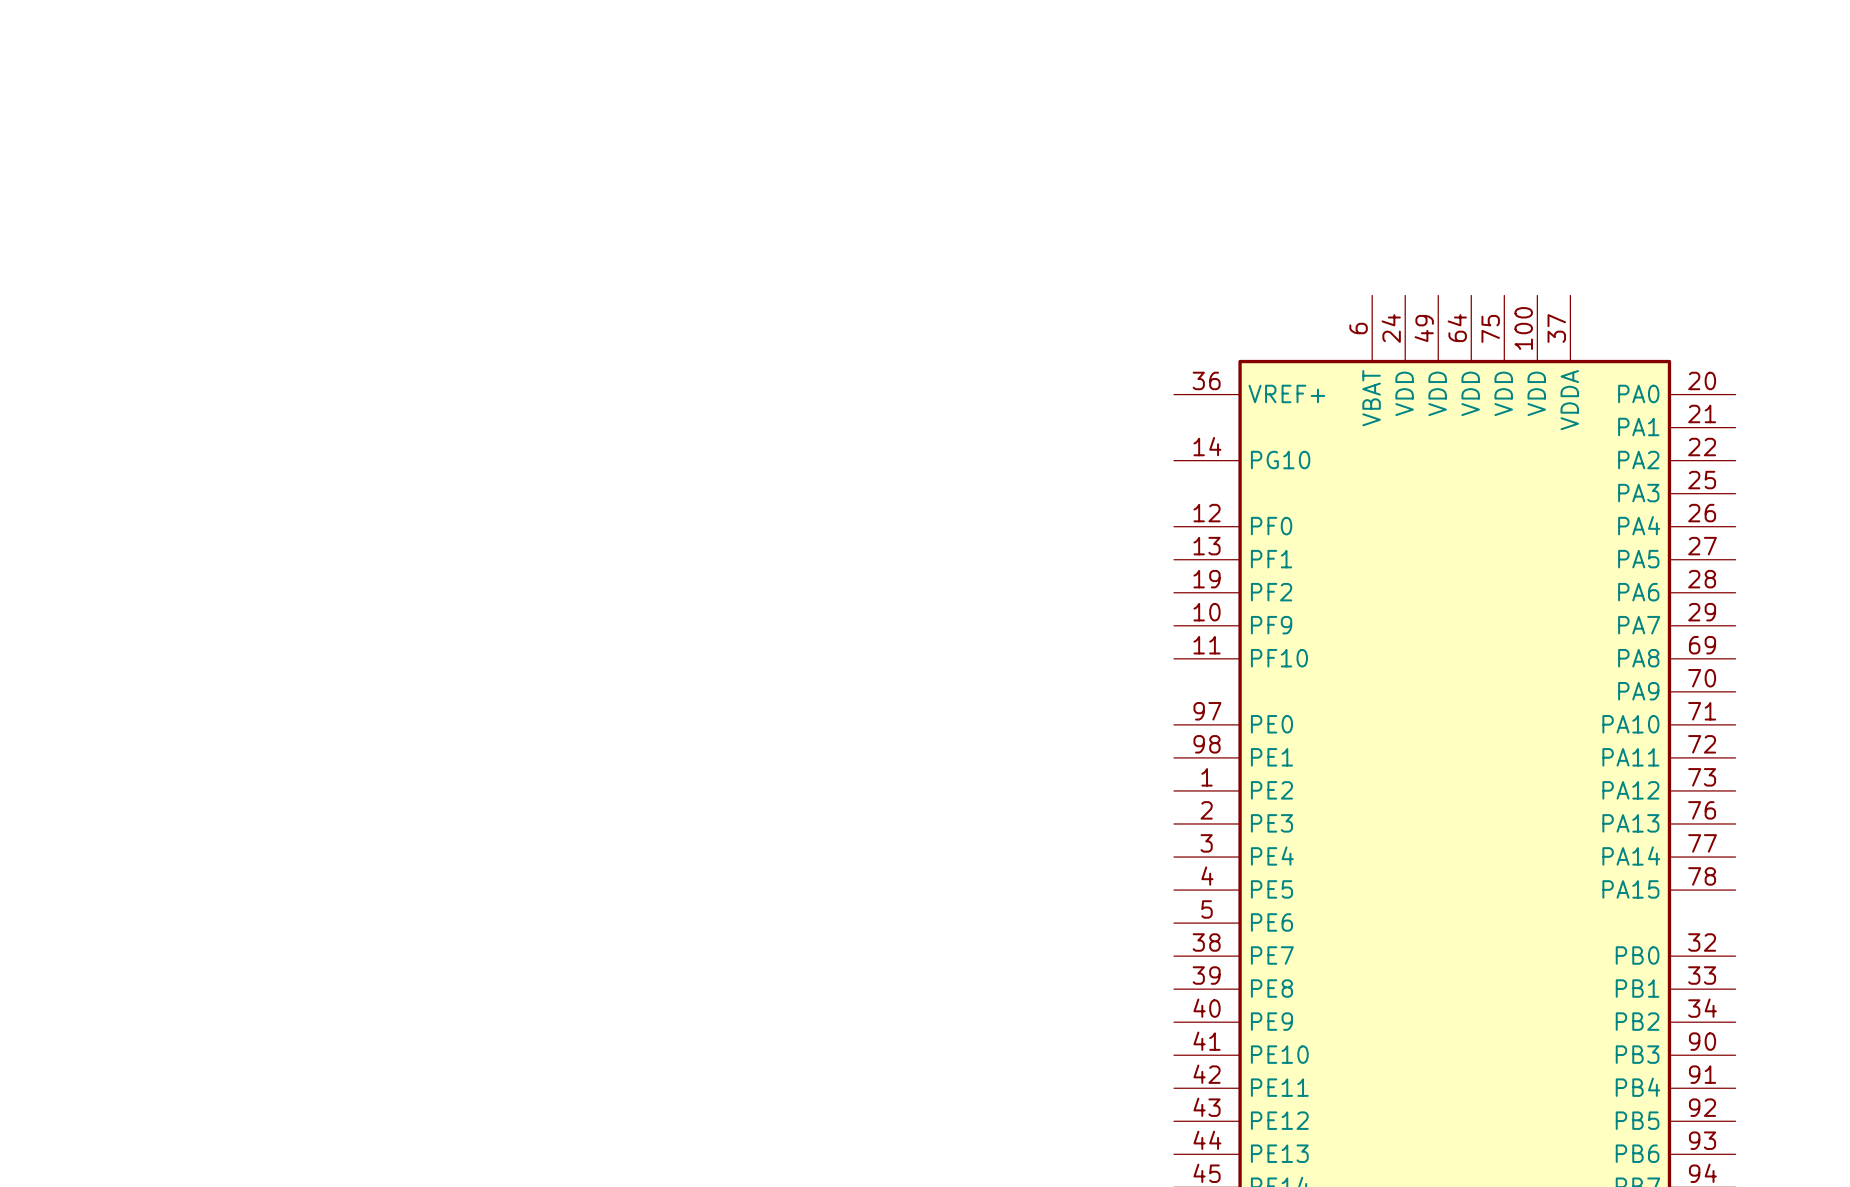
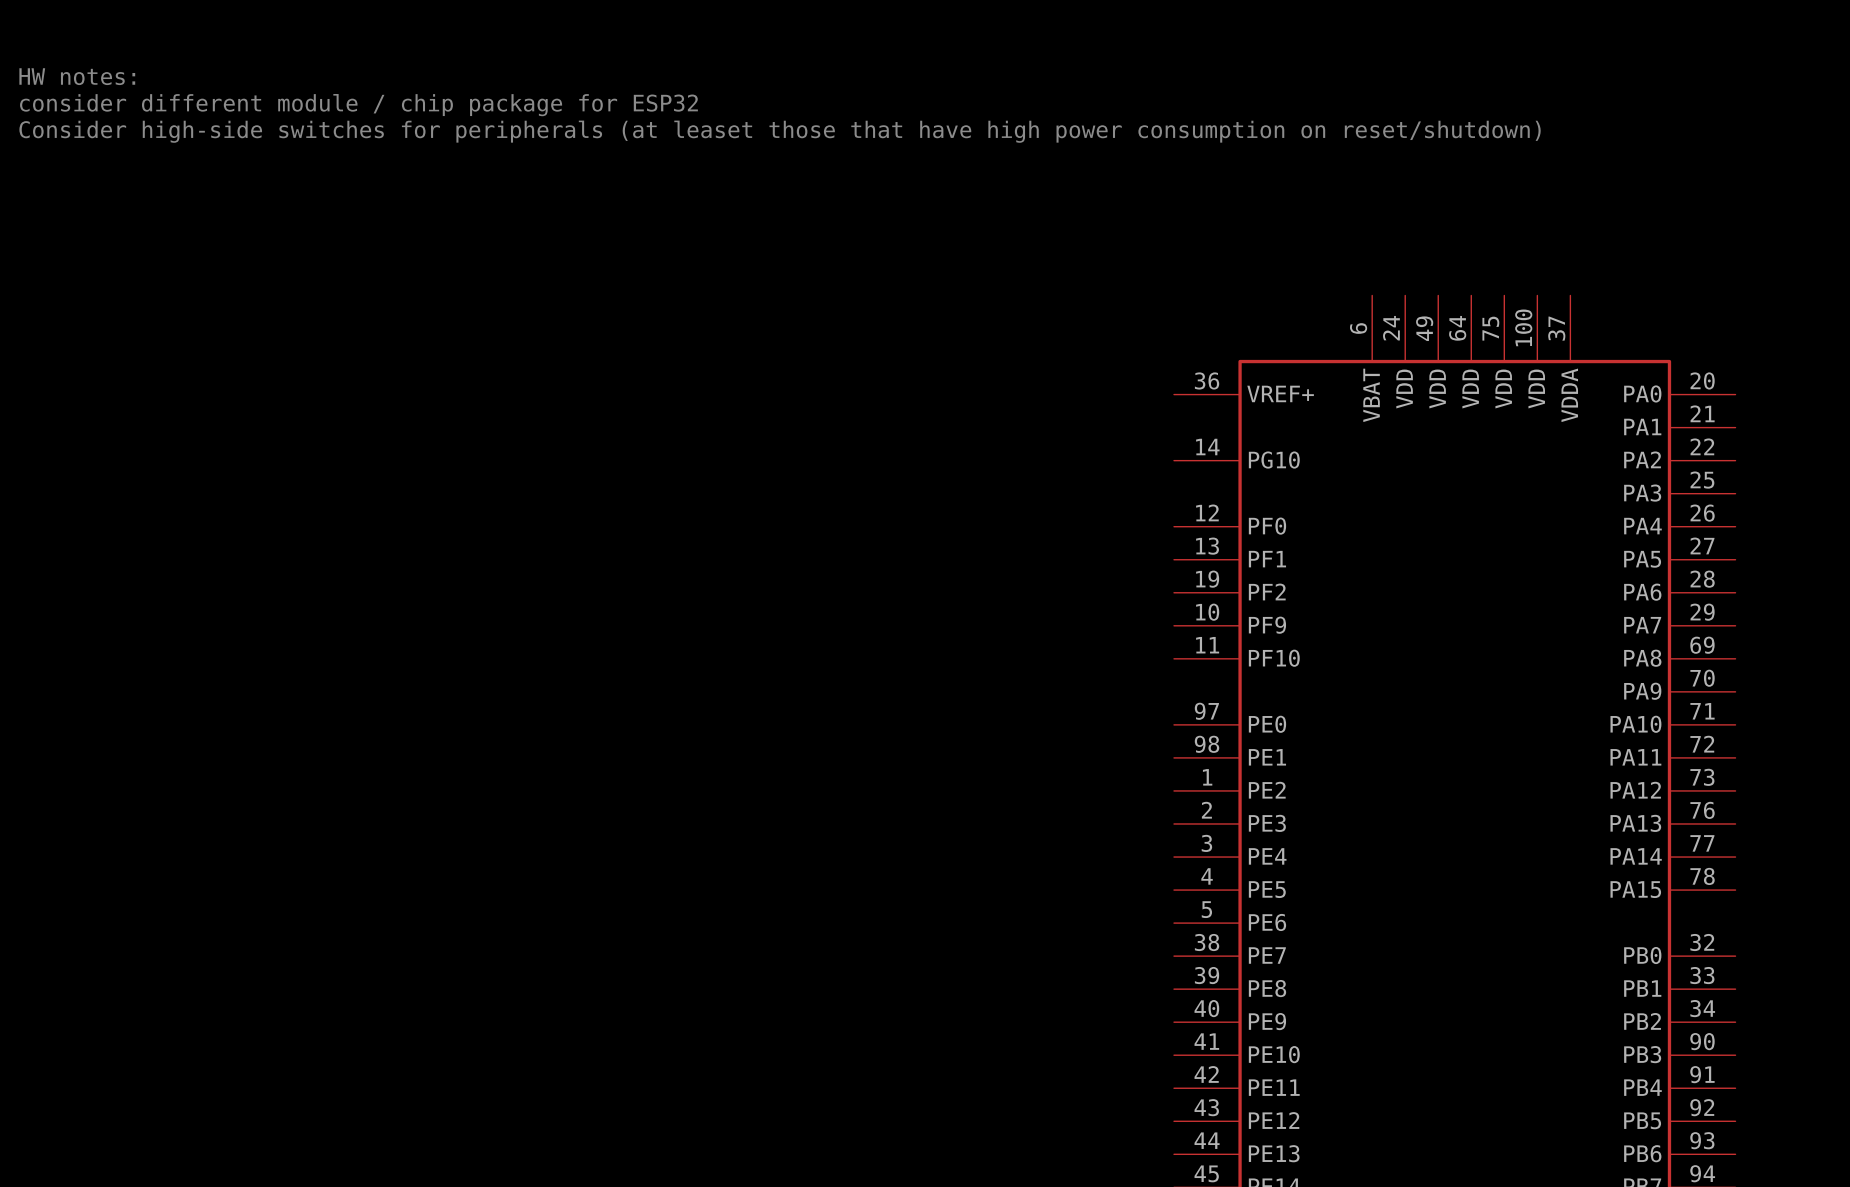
text: none -> HW notes: (77, 76)
text: none -> consider different module / chip package for ESP32 (358, 105)
text: none -> Consider high-side switches for peripherals (at leaset those that have high power consumption on reset/shutdown) (780, 131)

